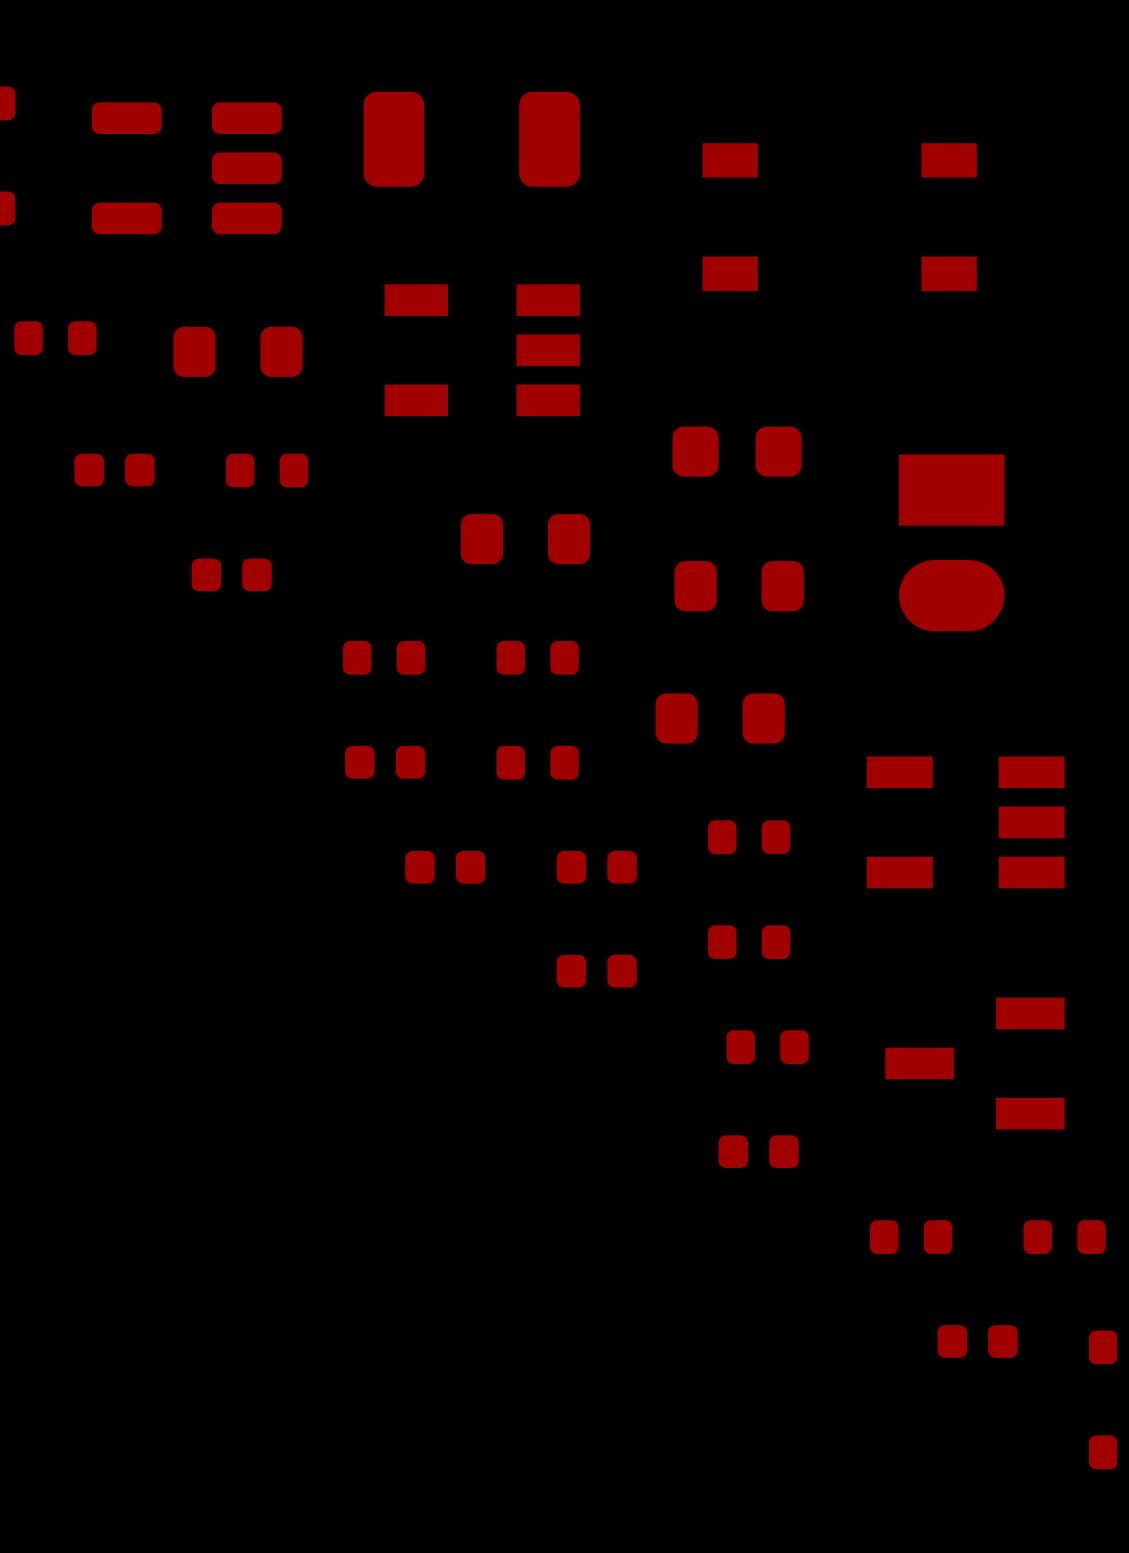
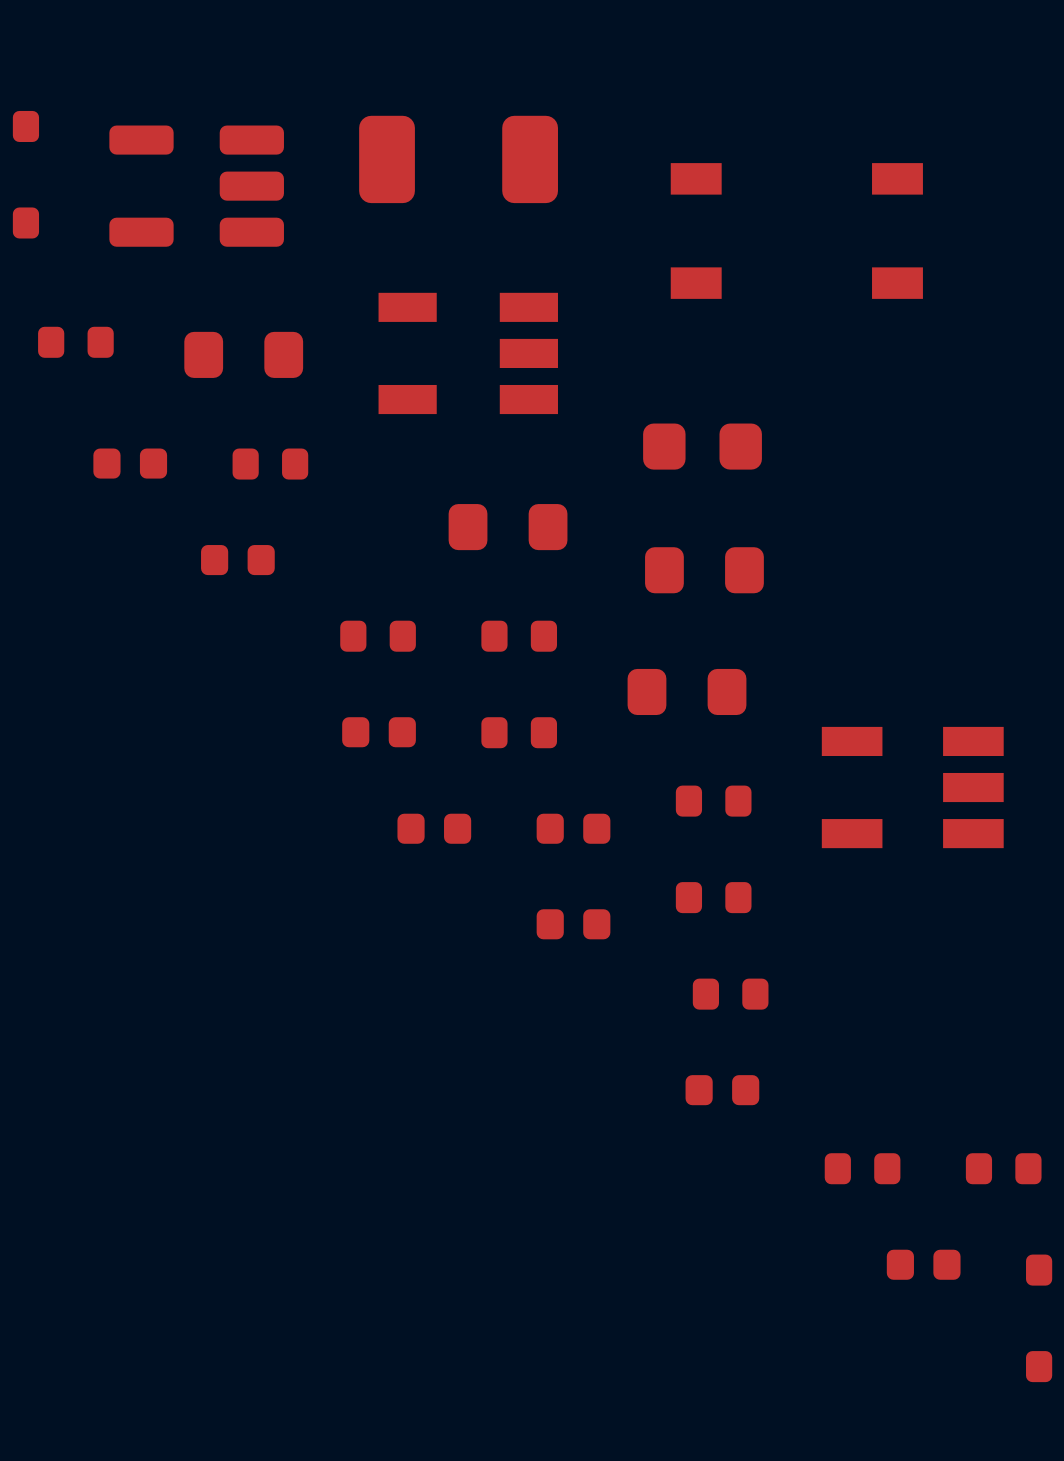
part: (951, 542) -> none
part: (974, 1063) -> none

